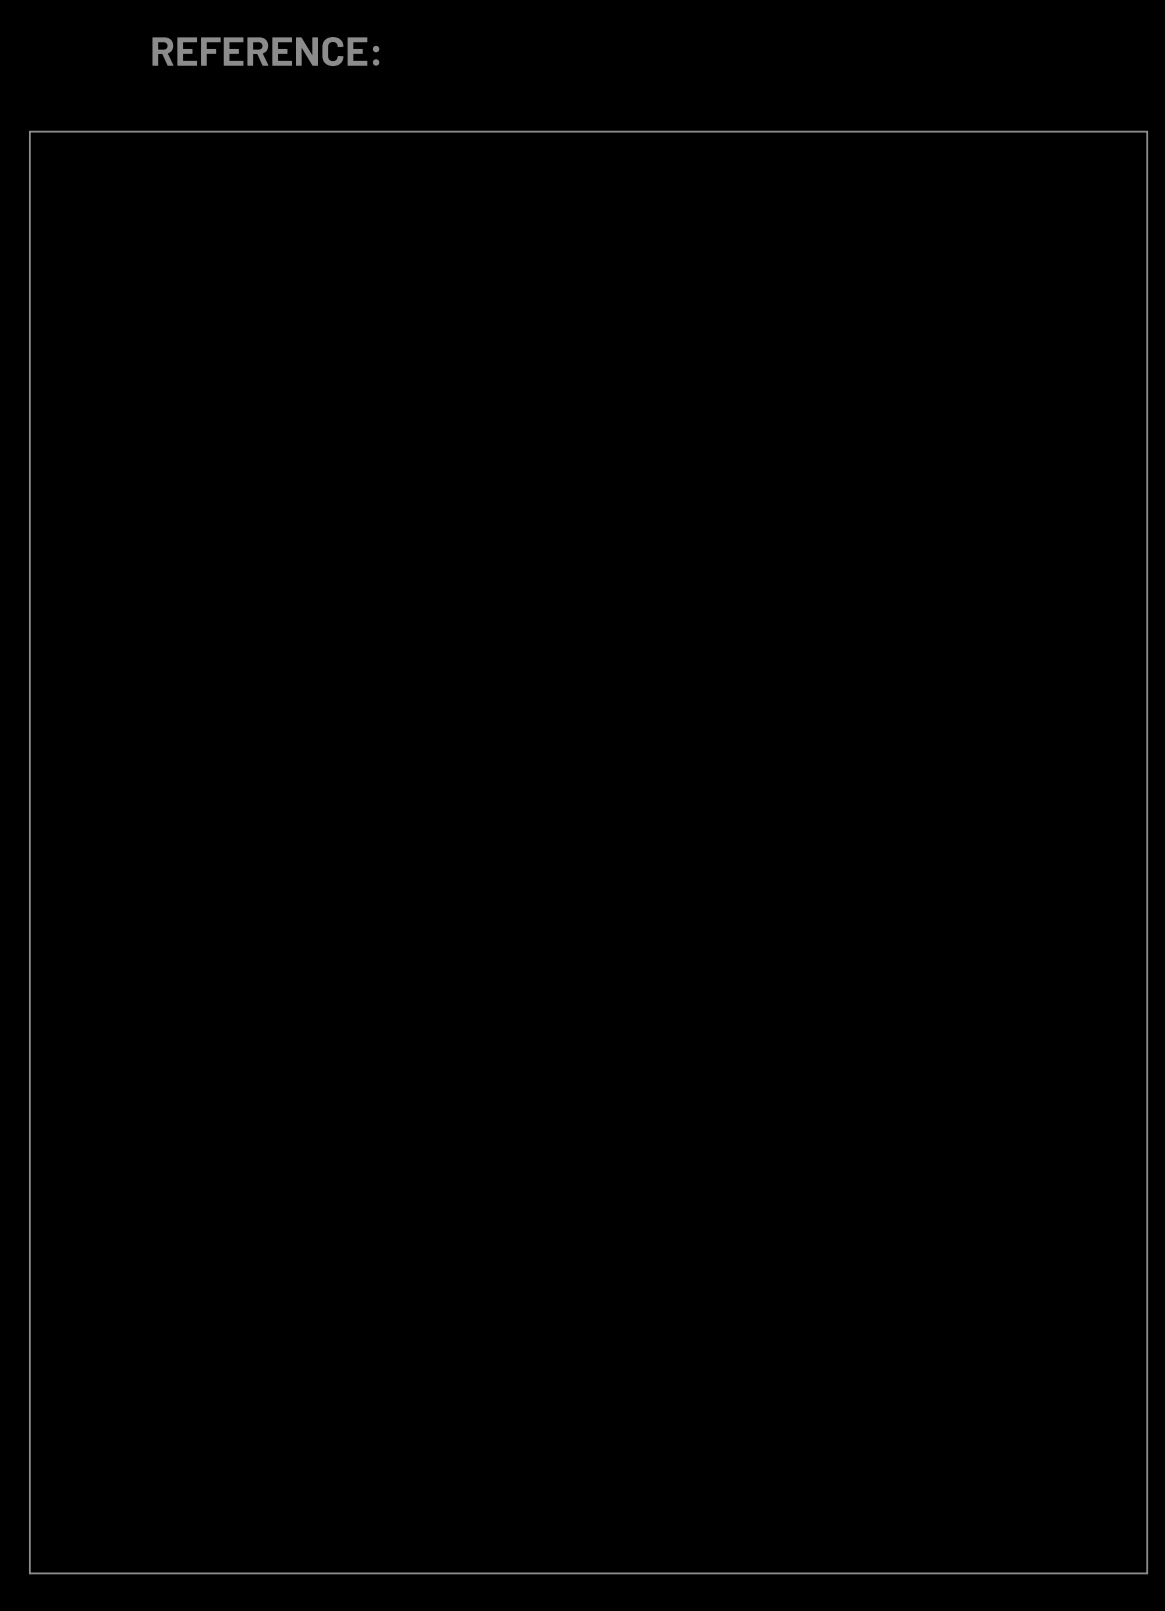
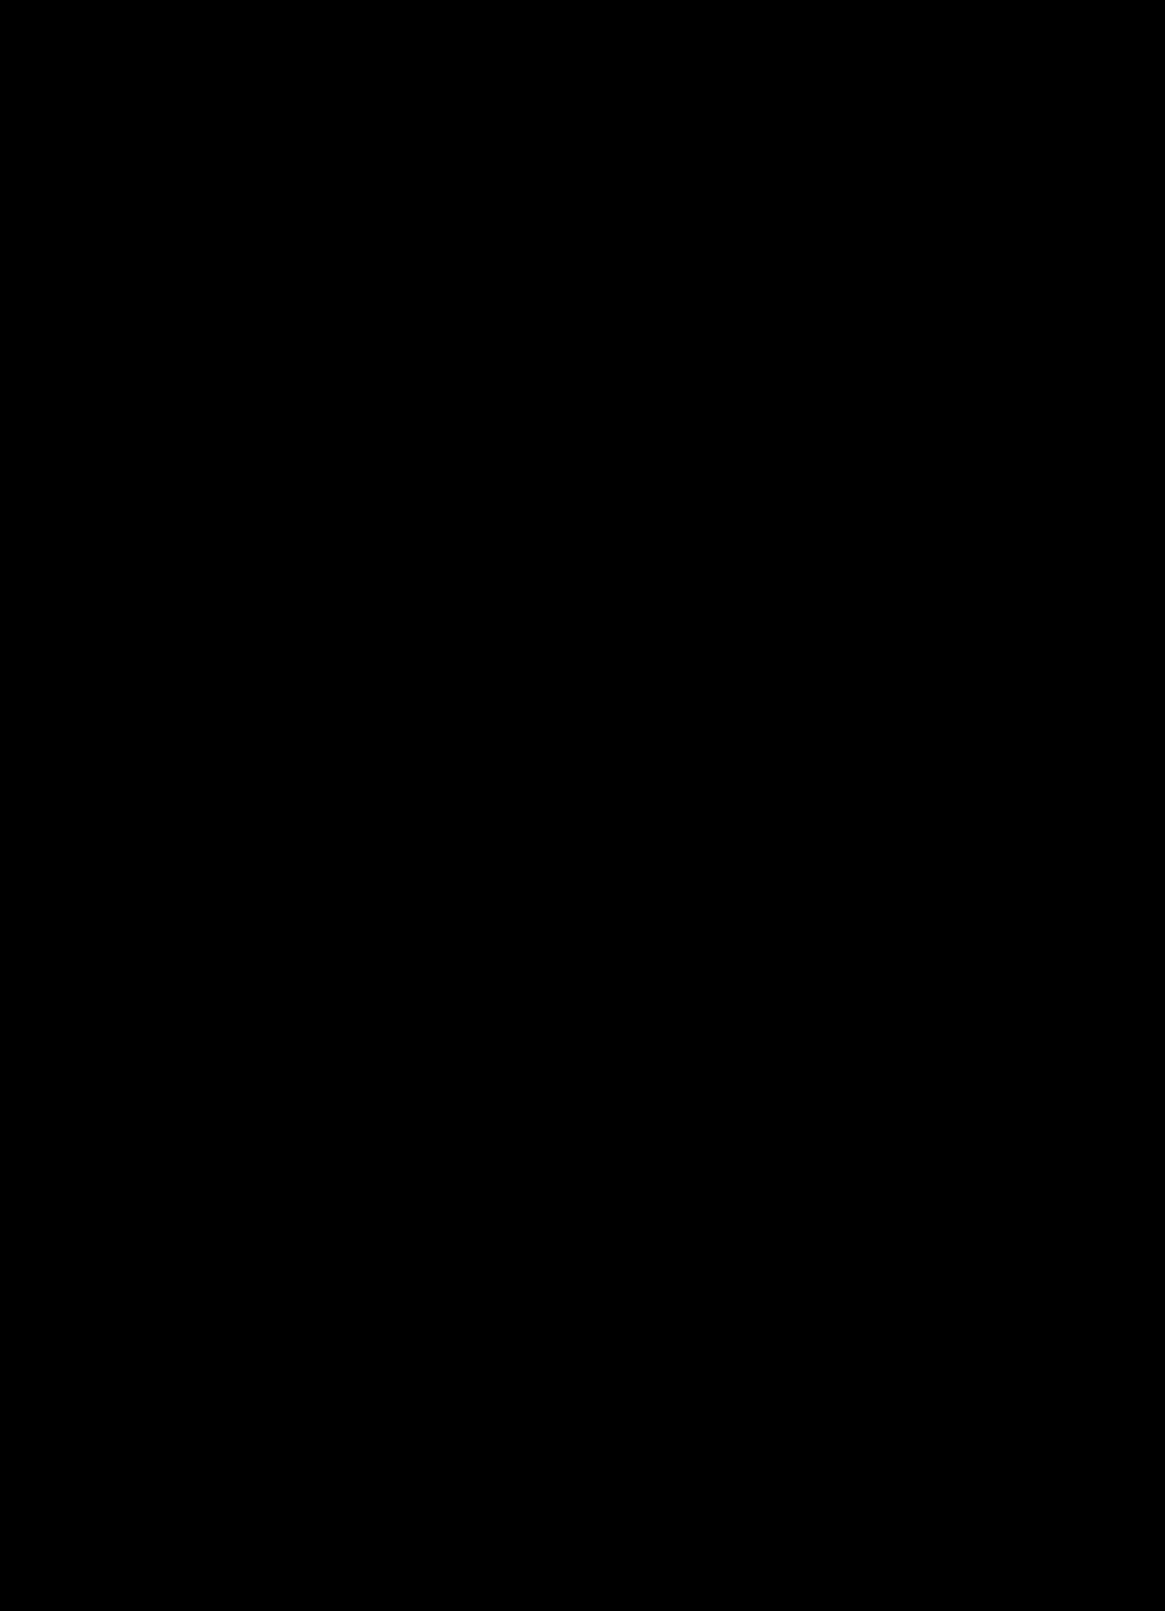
text: REFERENCE: (265, 51) -> none
line: (29, 131) (1147, 131) (1147, 1573) (29, 1573) (29, 131) -> none

